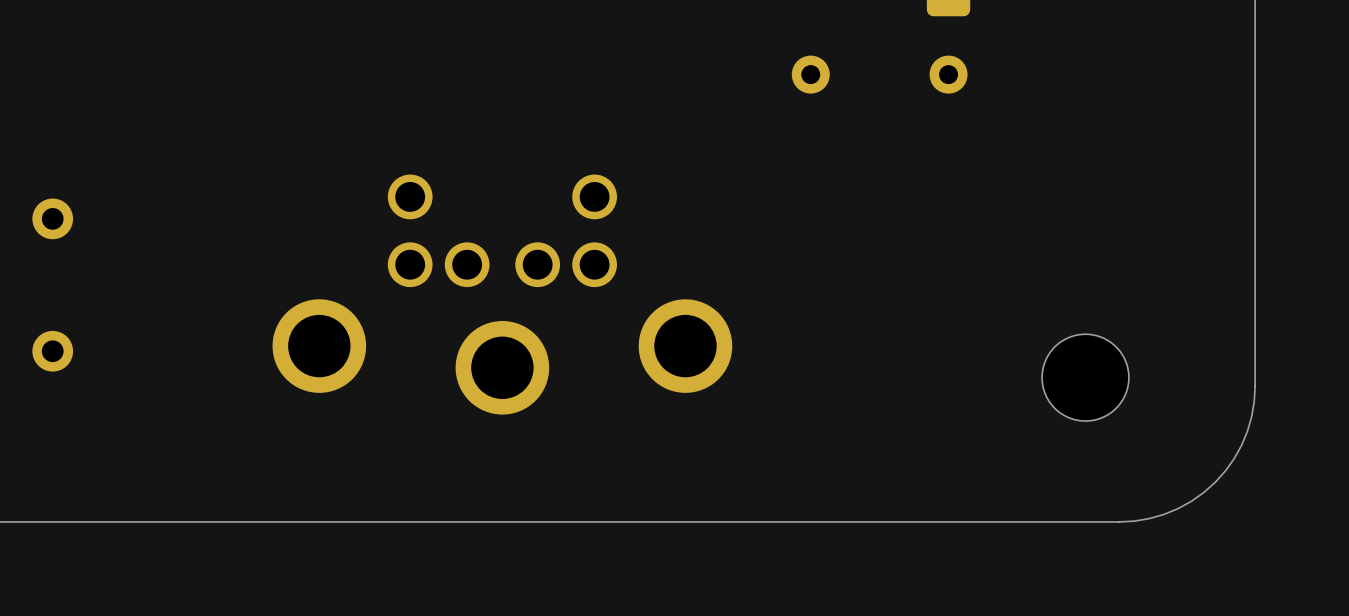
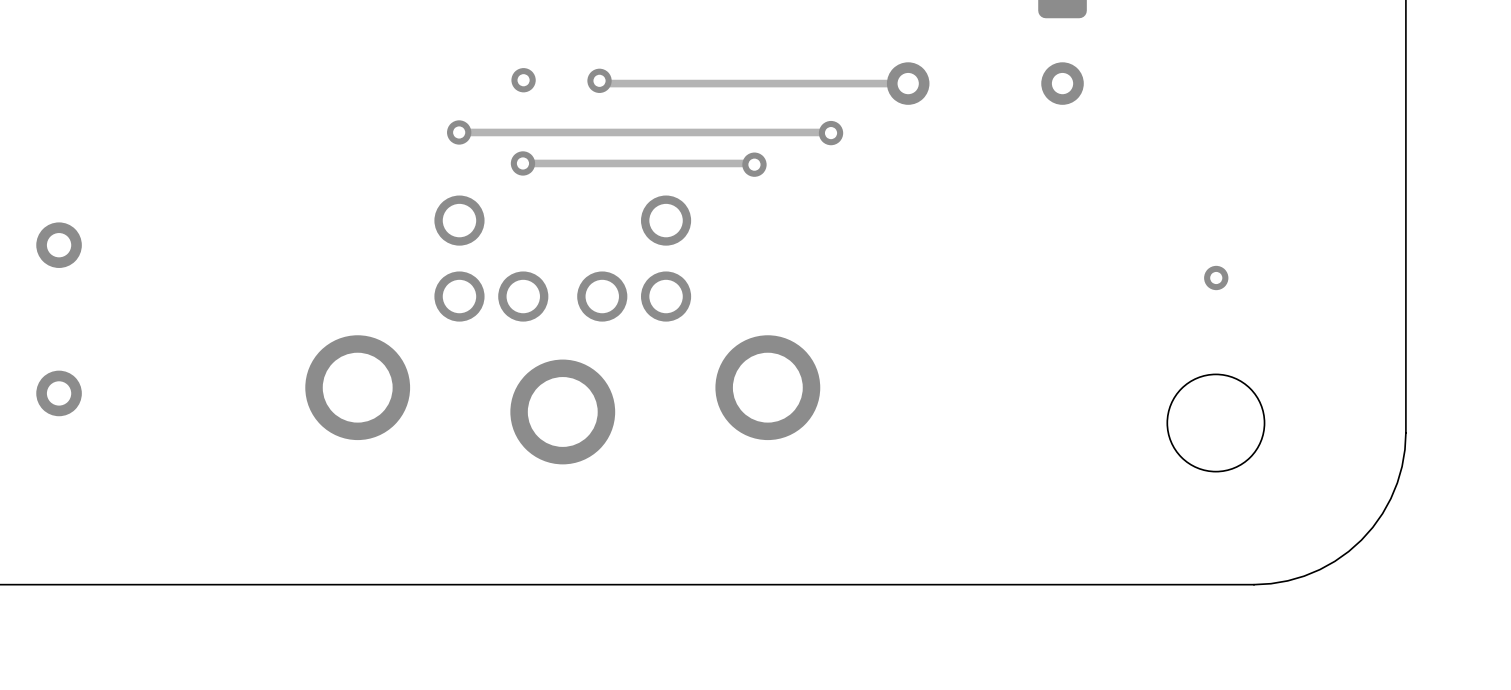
via: none -> (523, 80)
track: none -> (599, 80) (602, 83) (908, 83)
via: none -> (599, 80)
track: none -> (459, 132) (831, 133)
via: none -> (459, 132)
via: none -> (831, 133)
track: none -> (522, 163) (754, 164)
via: none -> (522, 163)
via: none -> (754, 164)
via: none -> (1216, 278)

